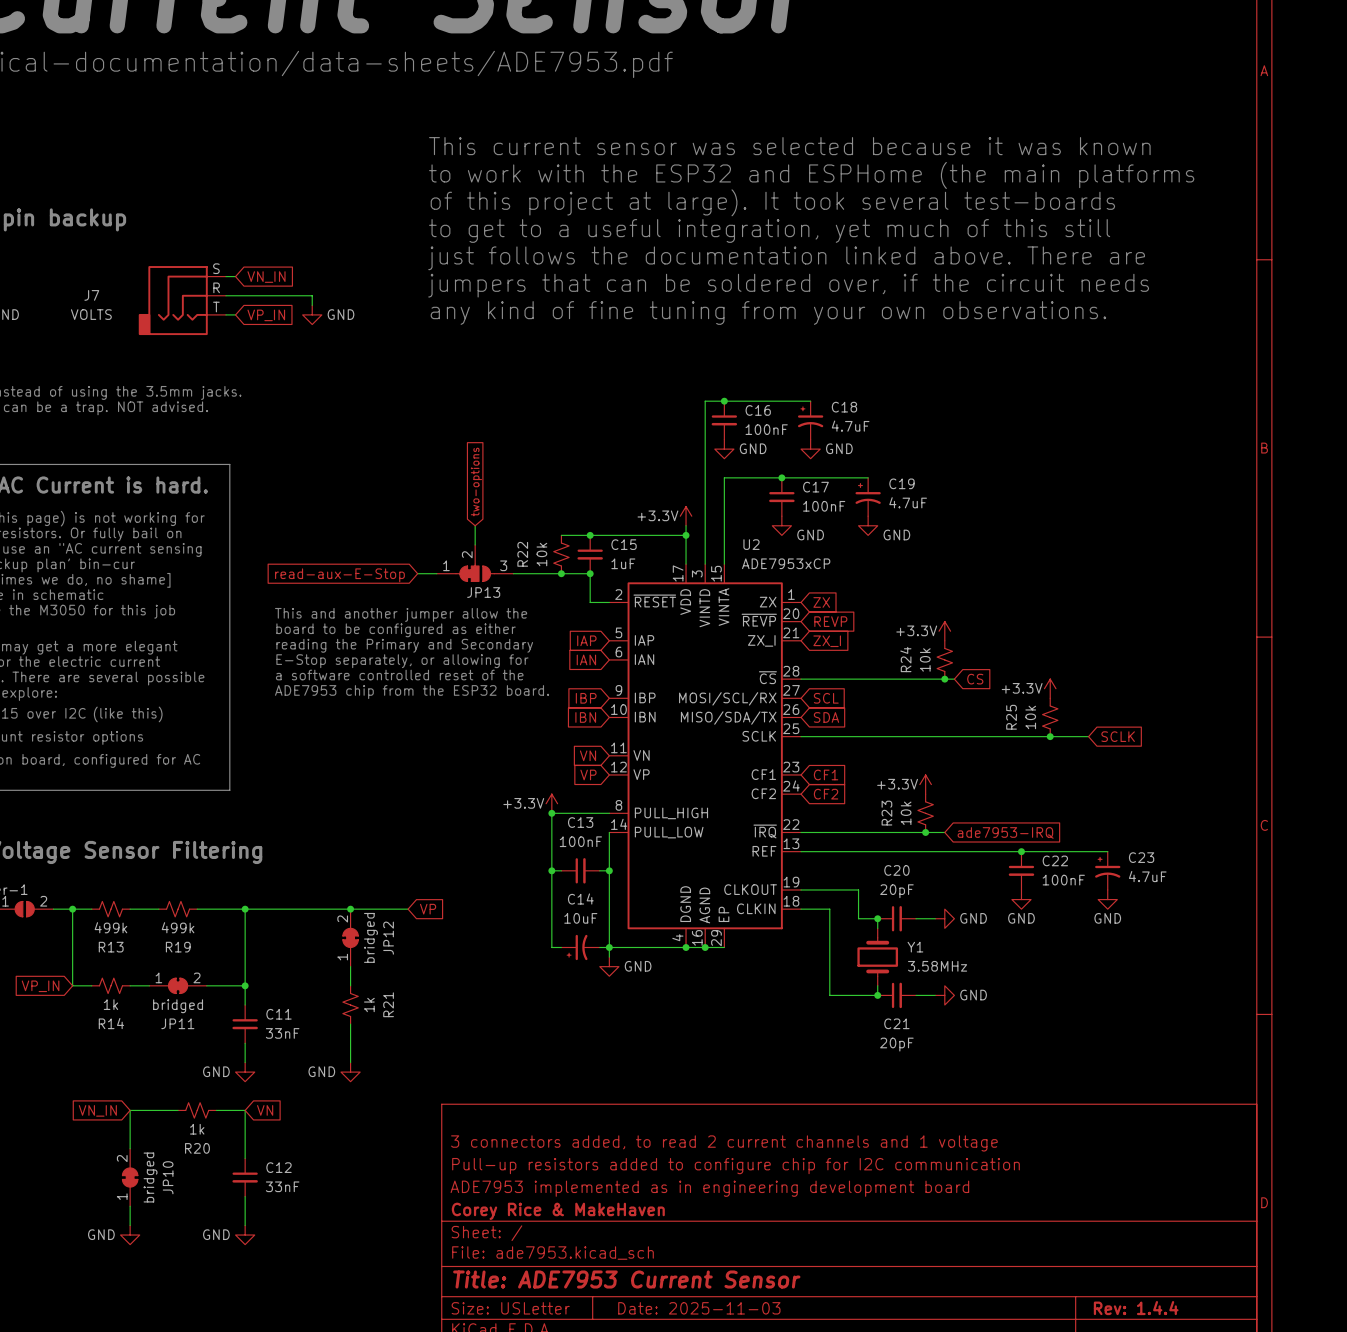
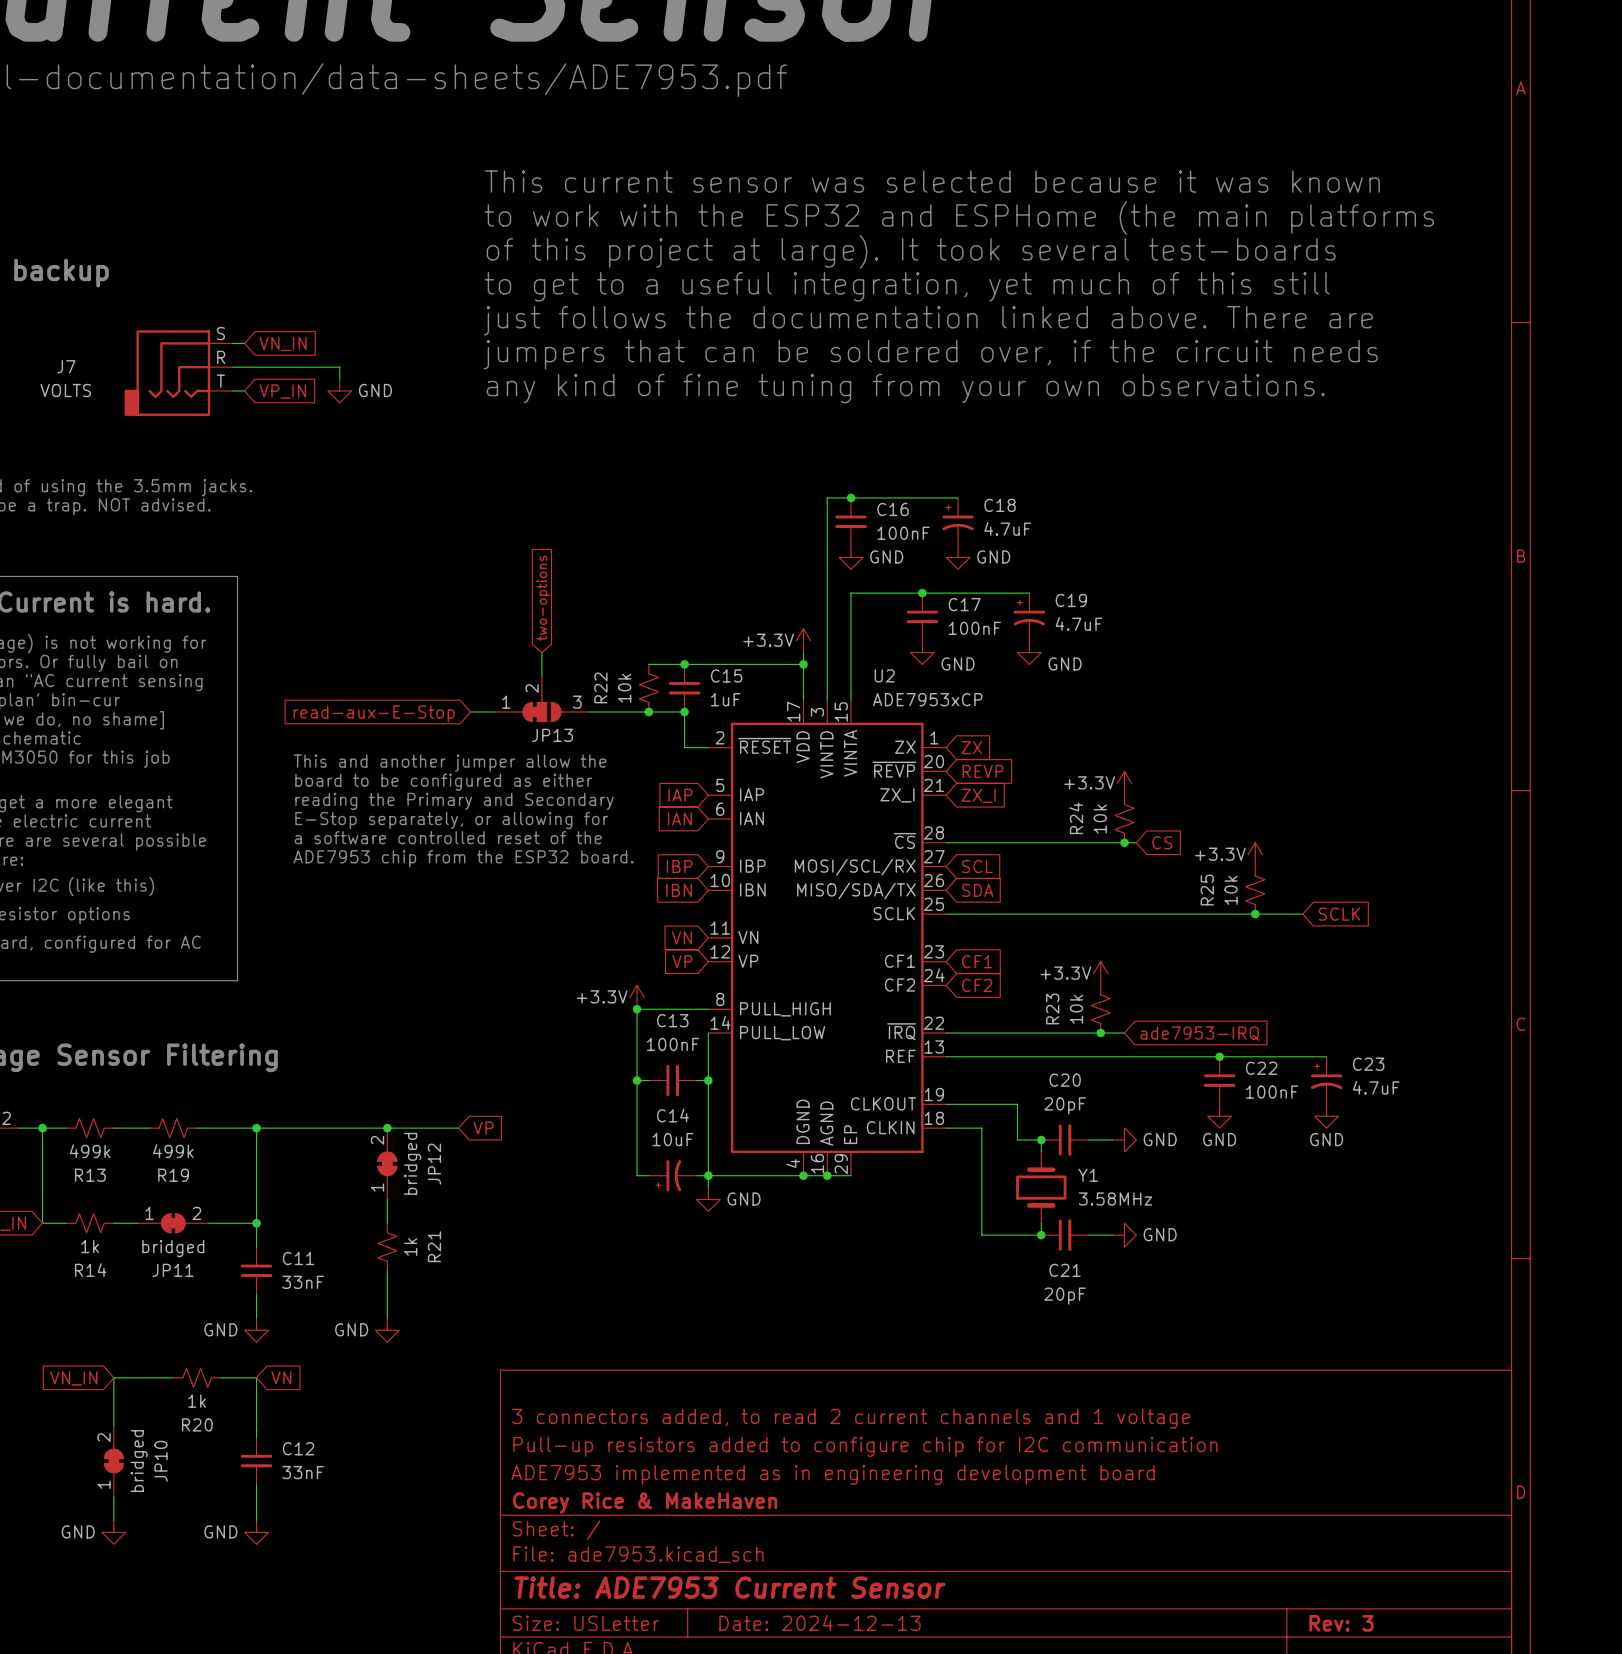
title block: Date: 2025-11-03 (699, 1308) -> Date: 2024-12-13 (820, 1622)
title block: Rev: 1.4.4 (1136, 1308) -> Rev: 3 (1341, 1623)

